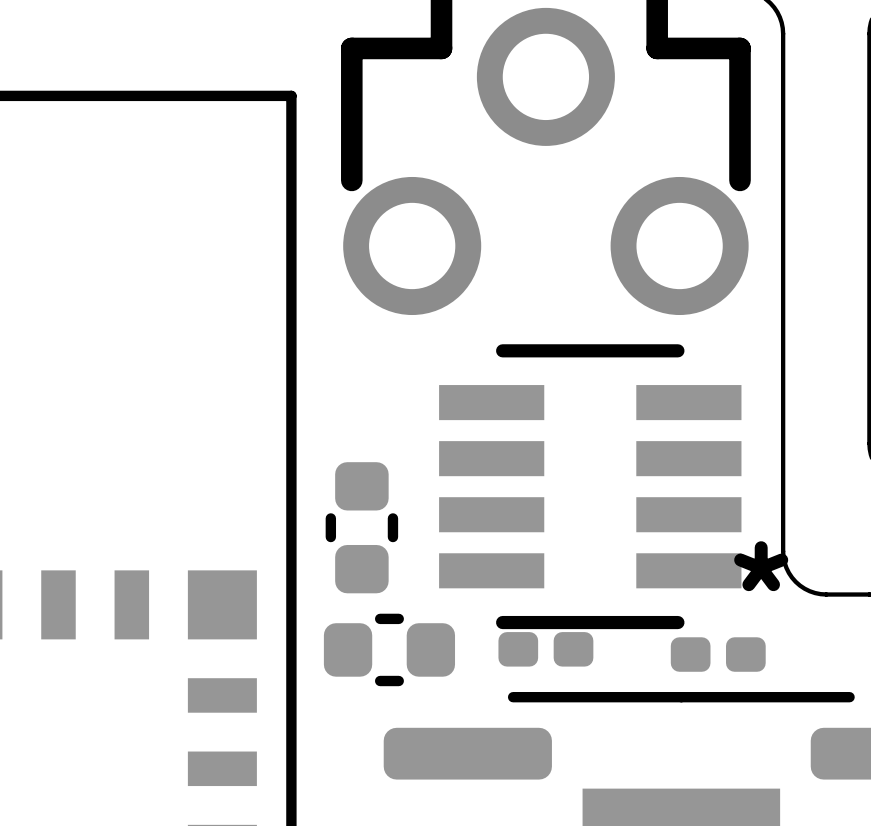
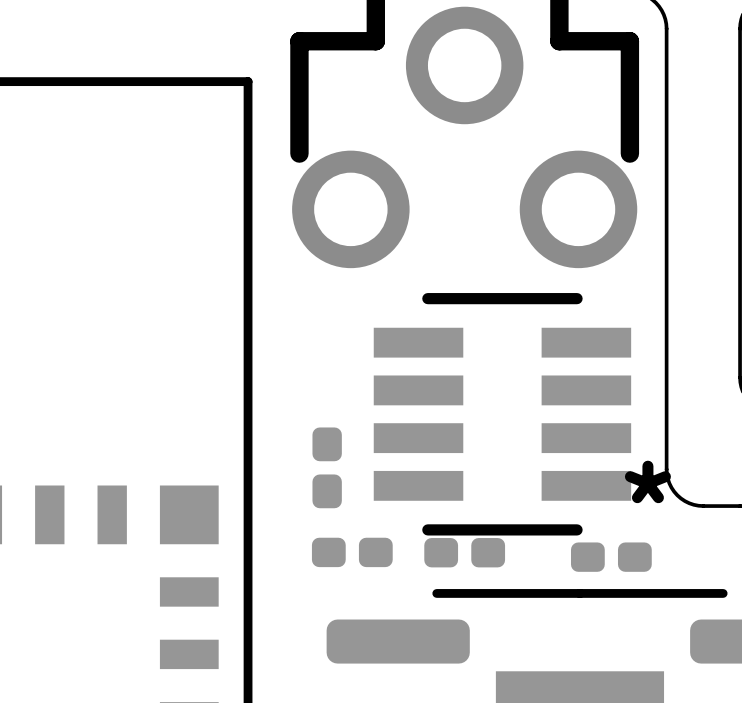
part footprint: [325, 462, 399, 594] -> [312, 427, 342, 509]
part footprint: [323, 613, 456, 687] -> [311, 537, 393, 568]

